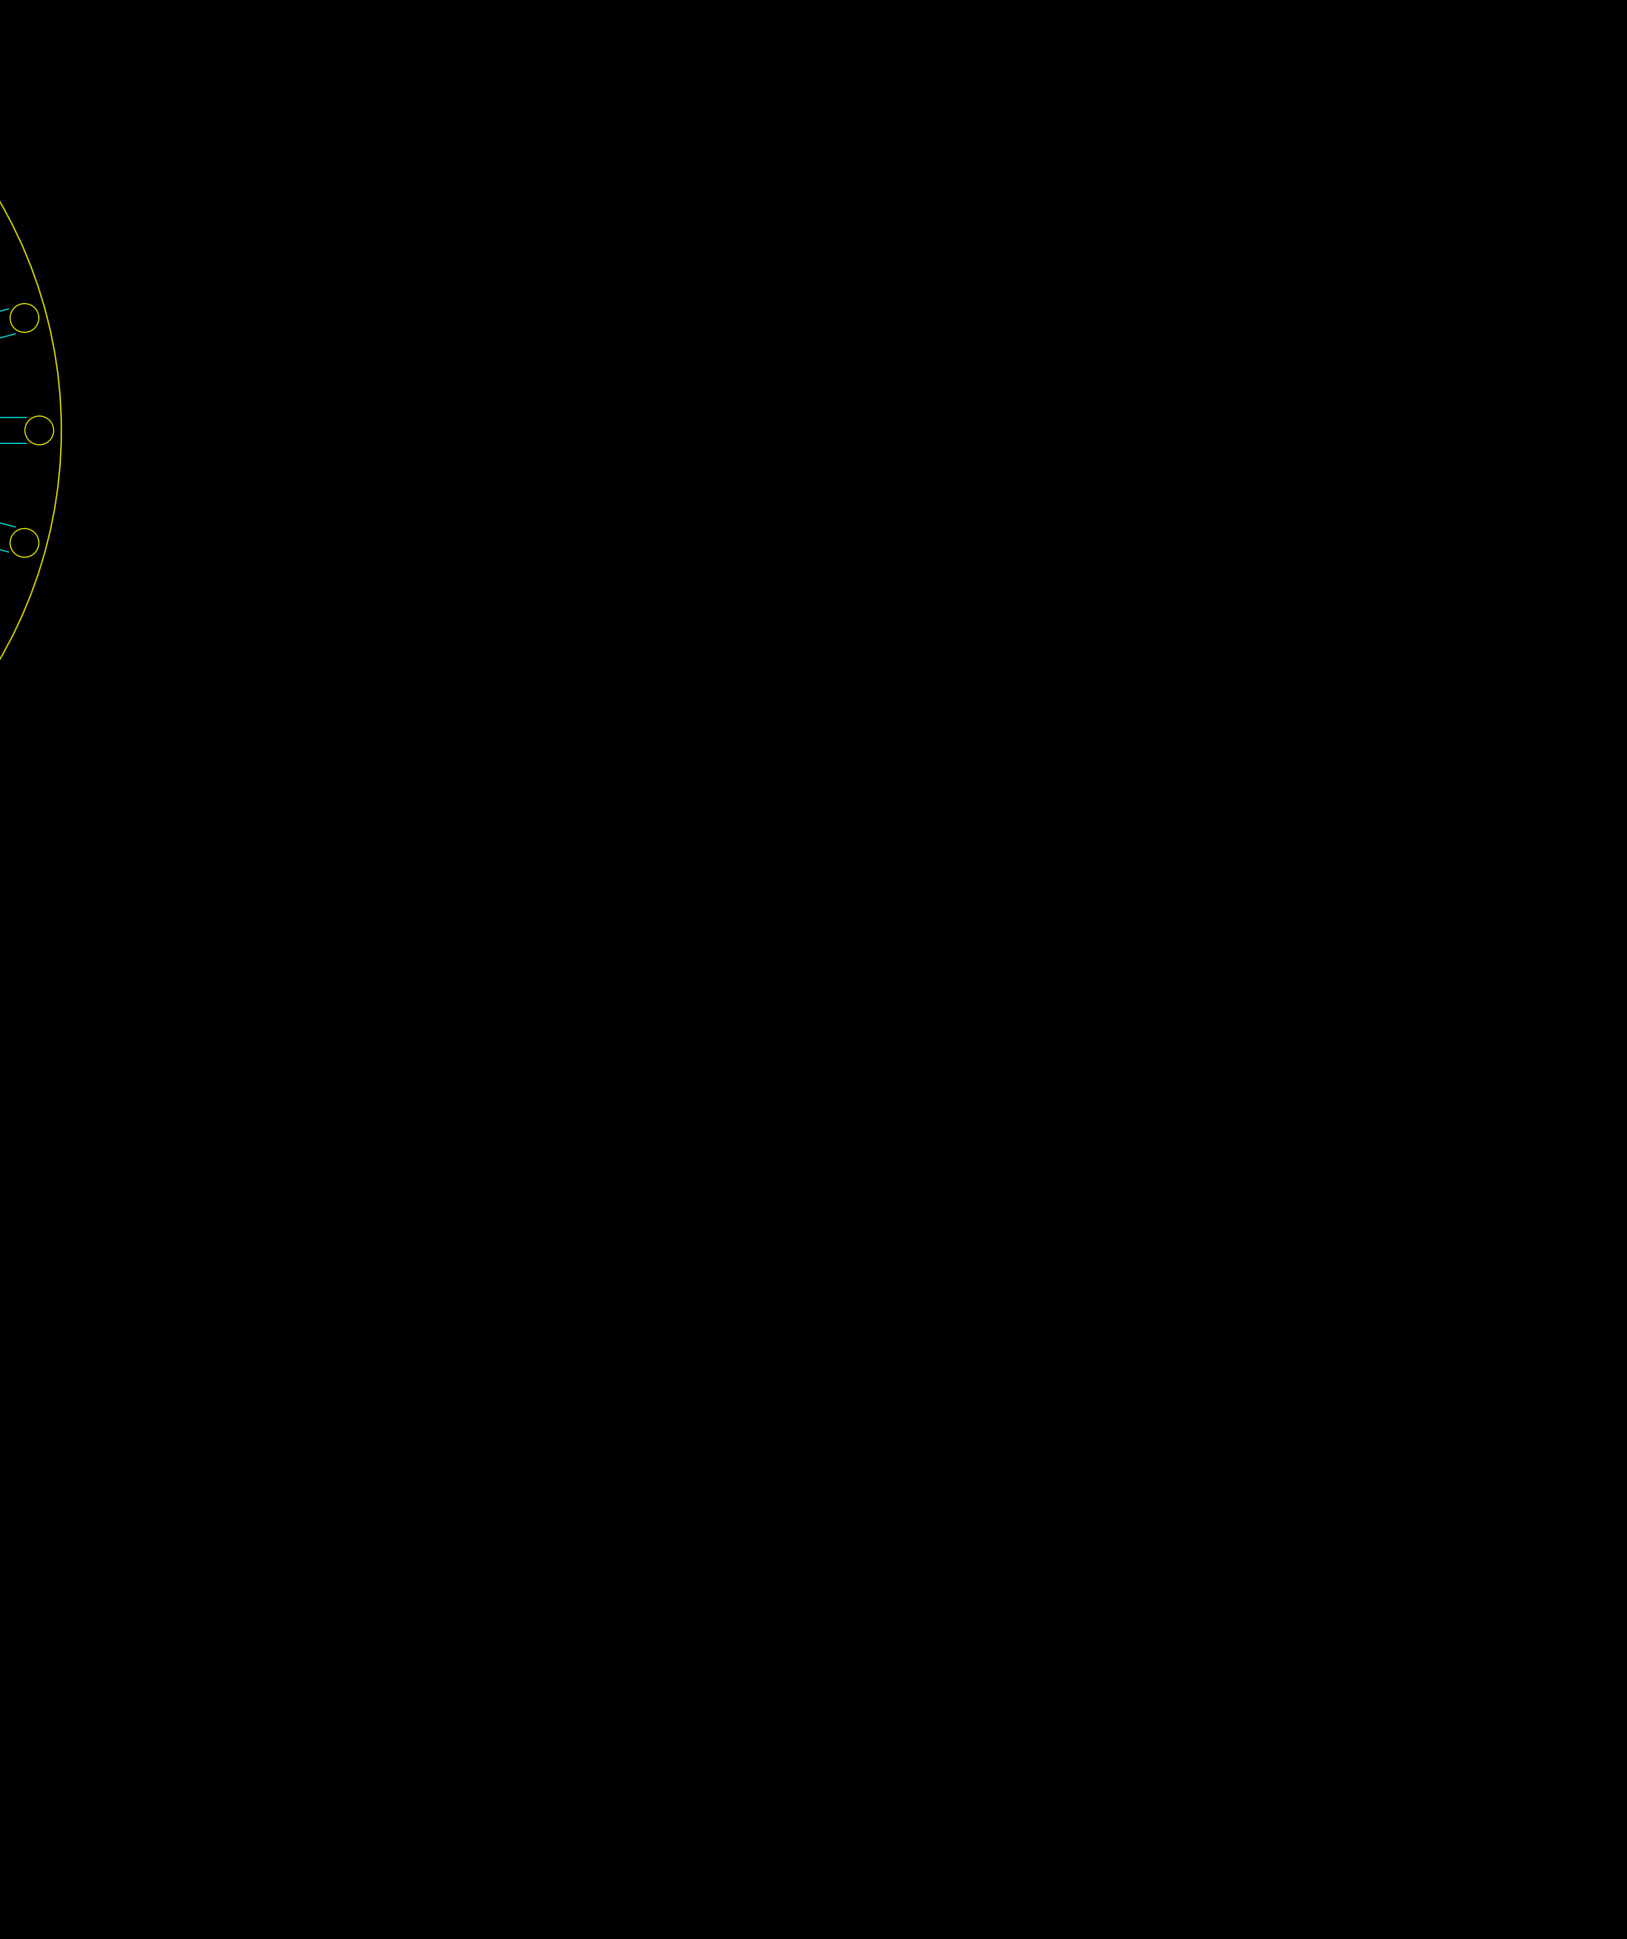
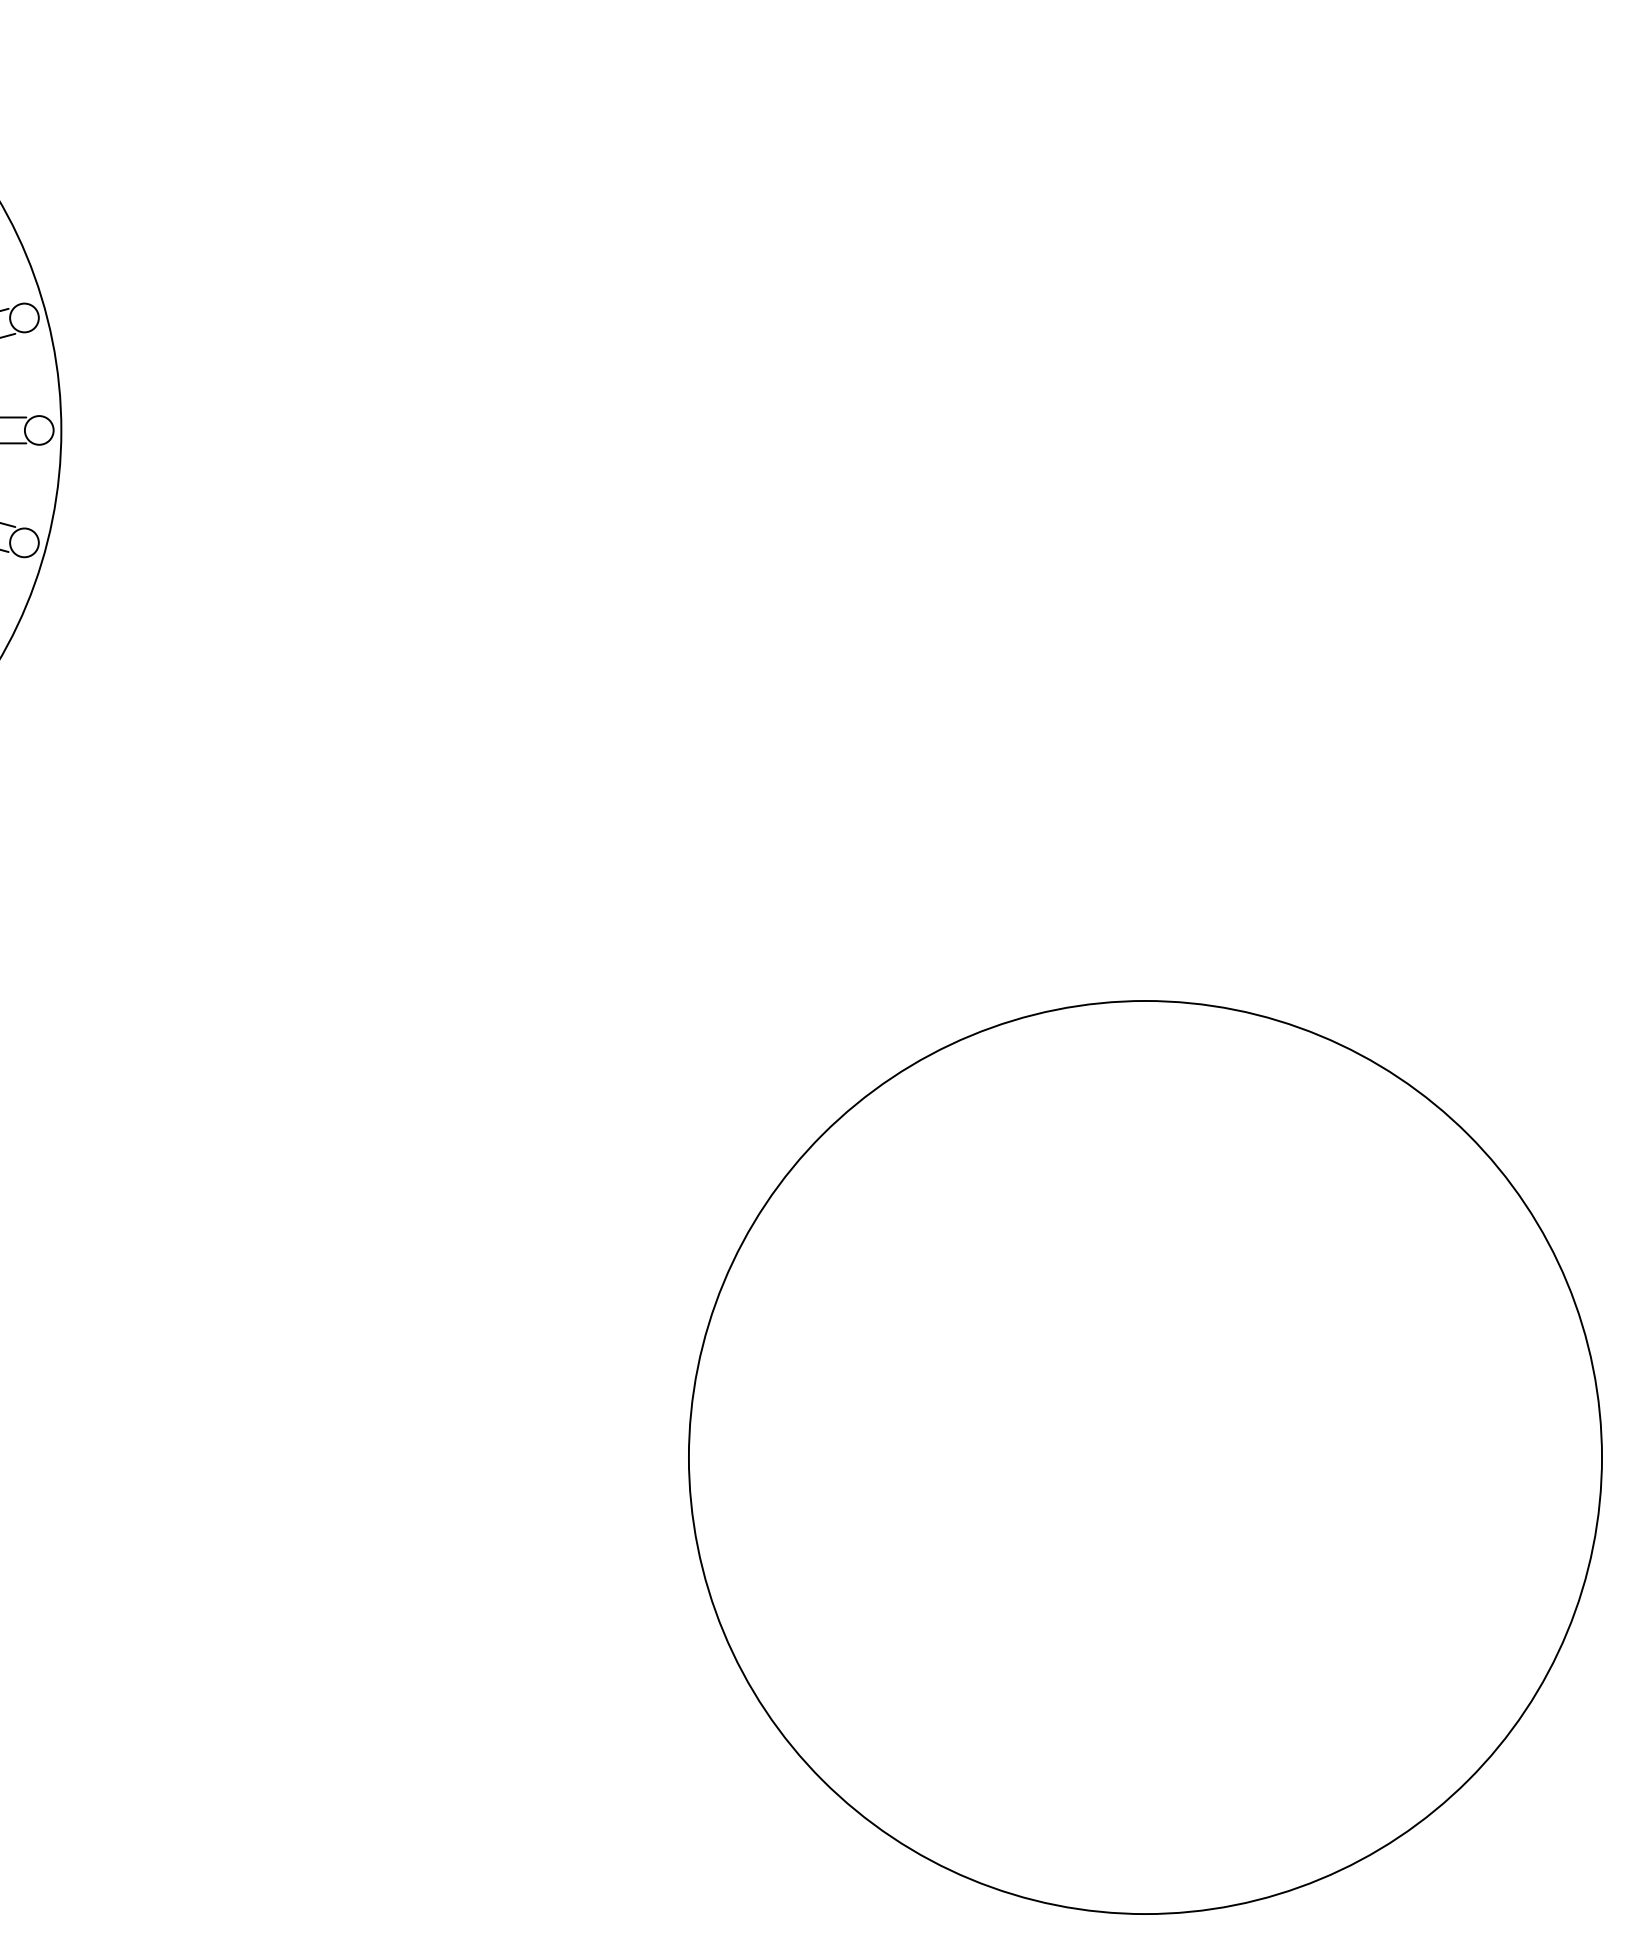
round board edge: none -> [688, 1000, 1603, 1915]

